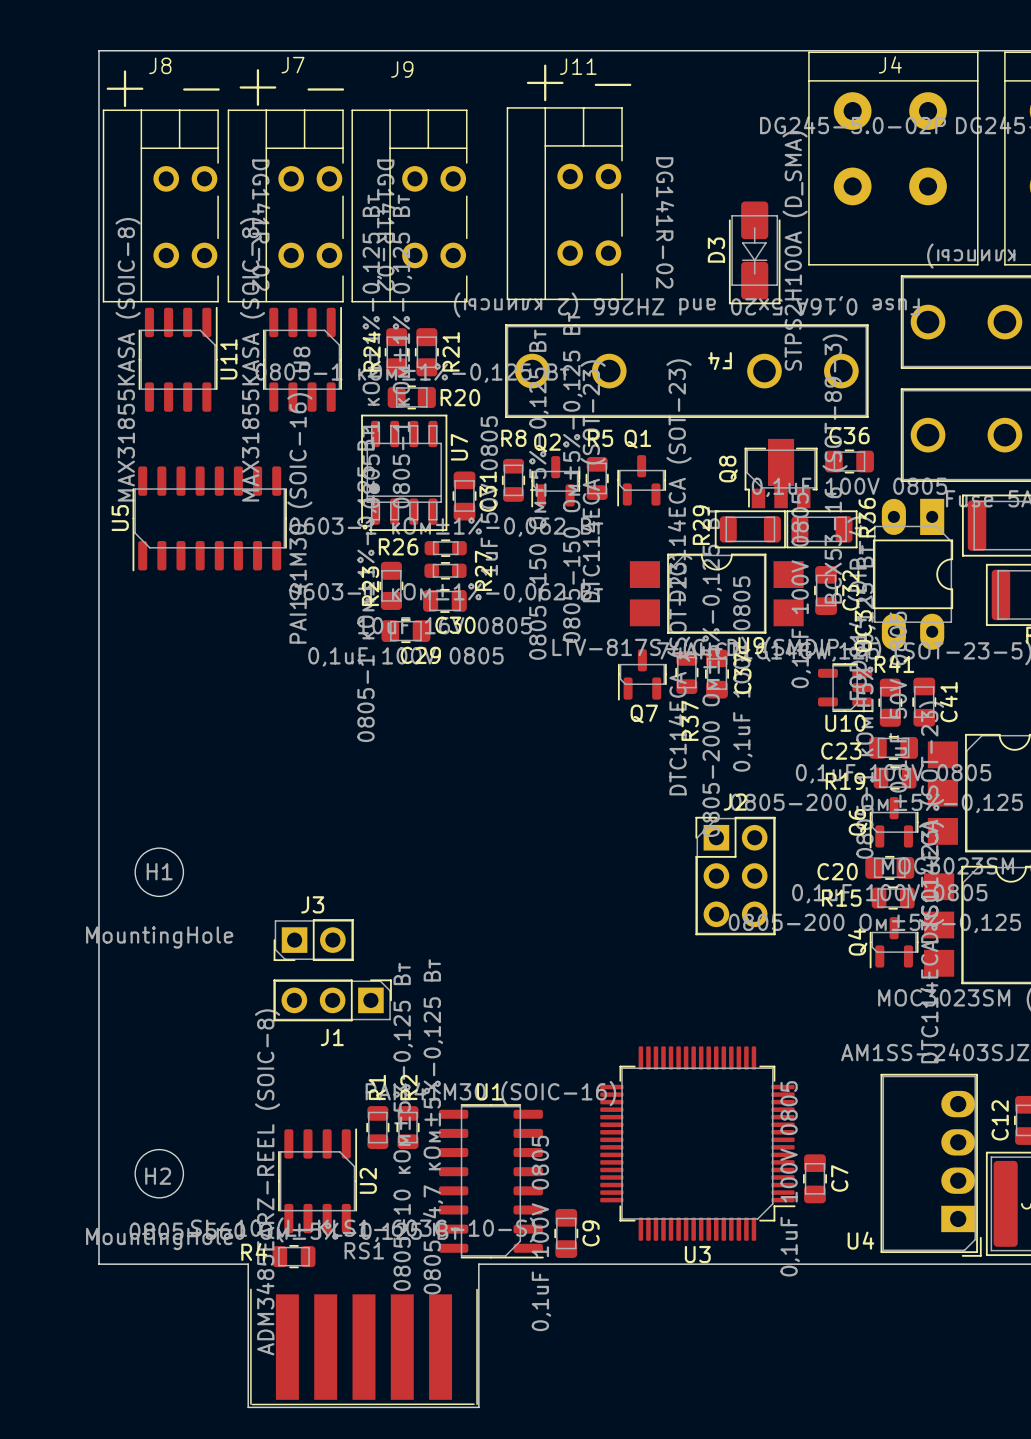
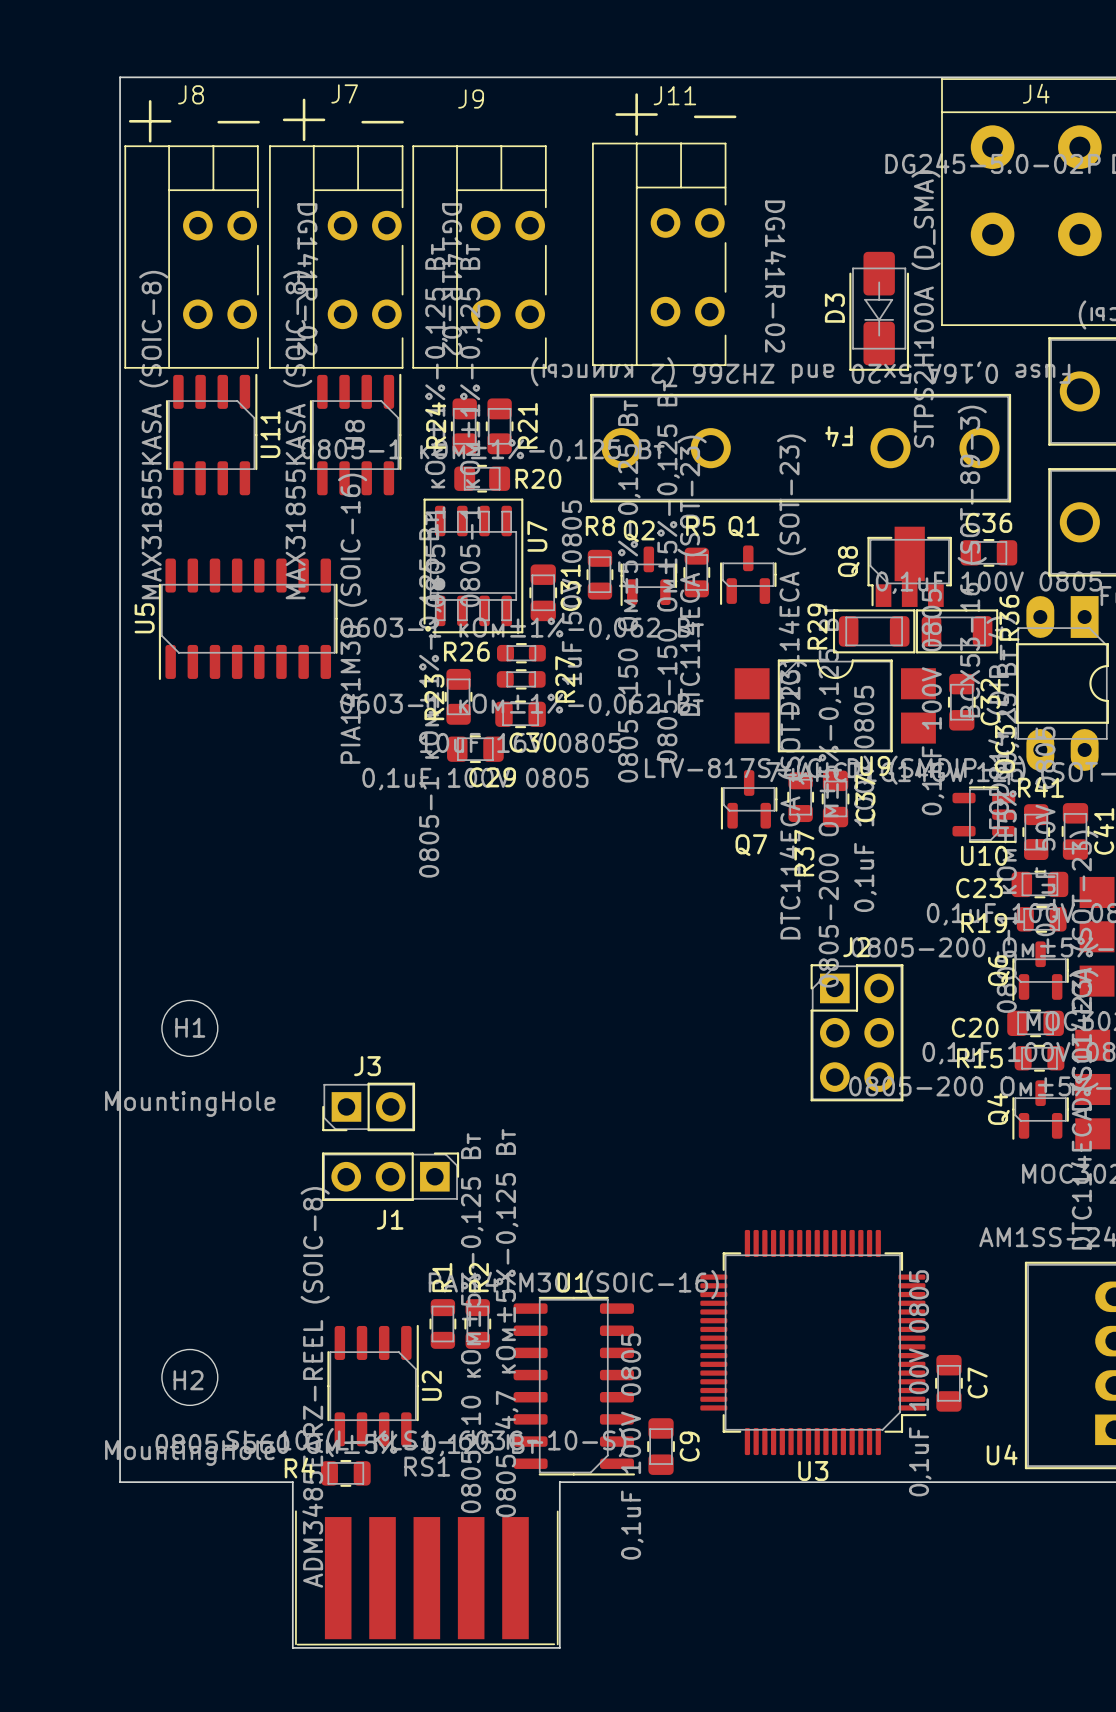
U5 value: PAI141M30 (SOIC-16) (299, 518) -> PIA141M30 (SOIC-16) (352, 618)

